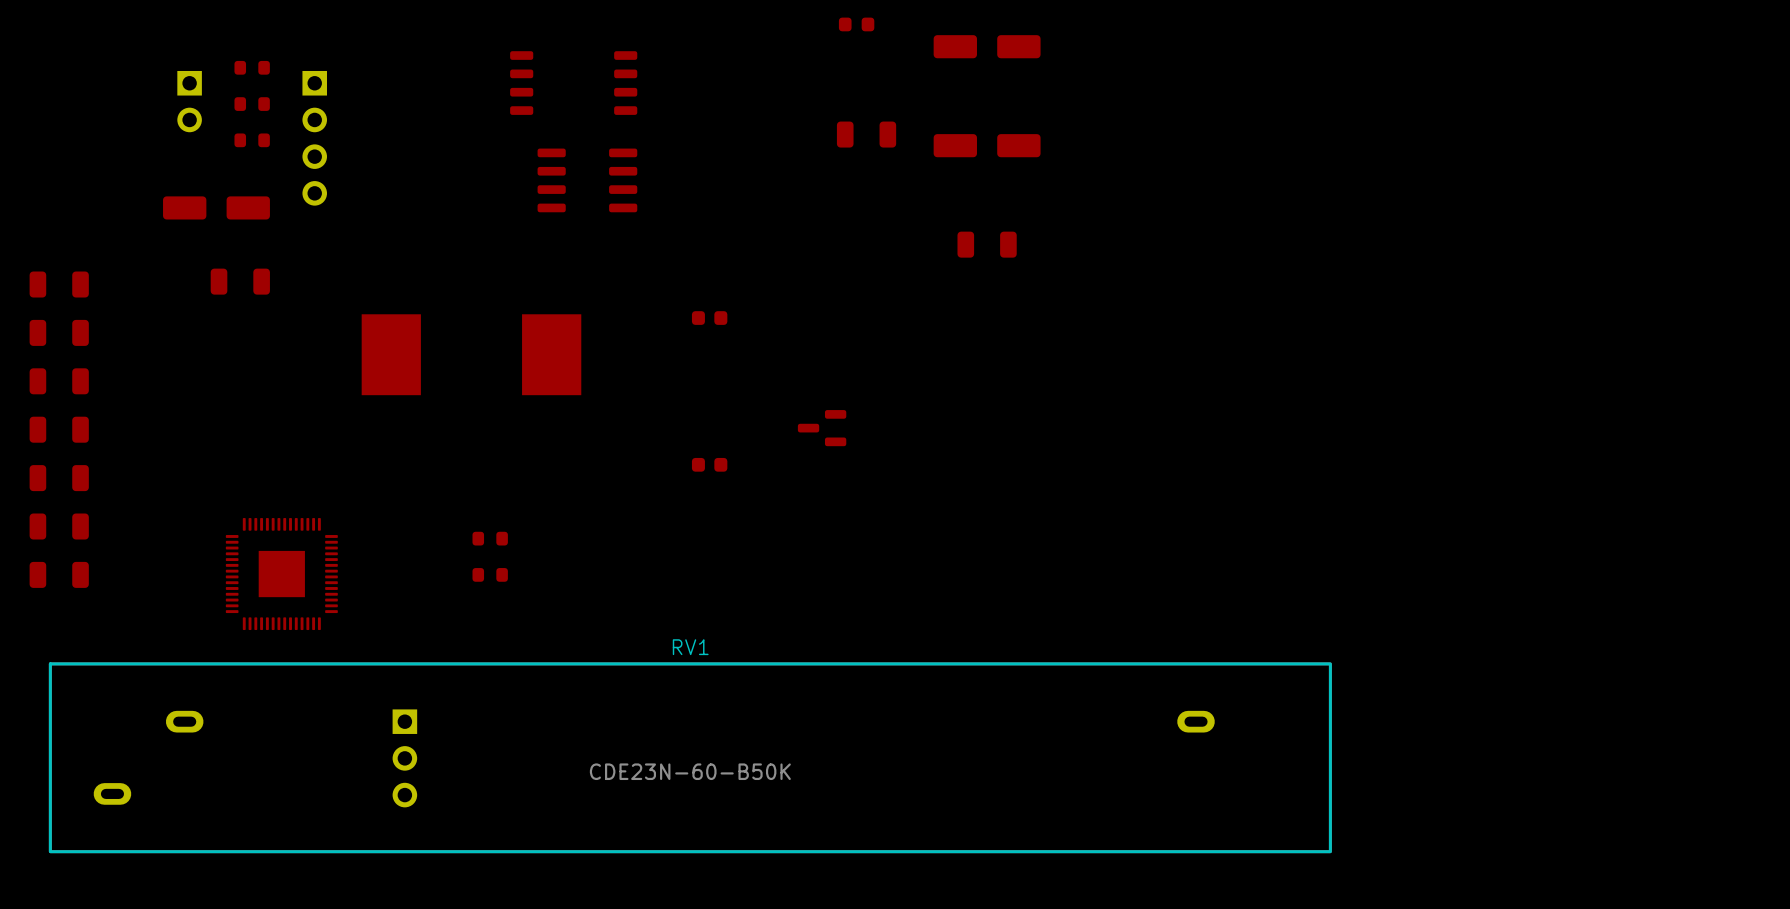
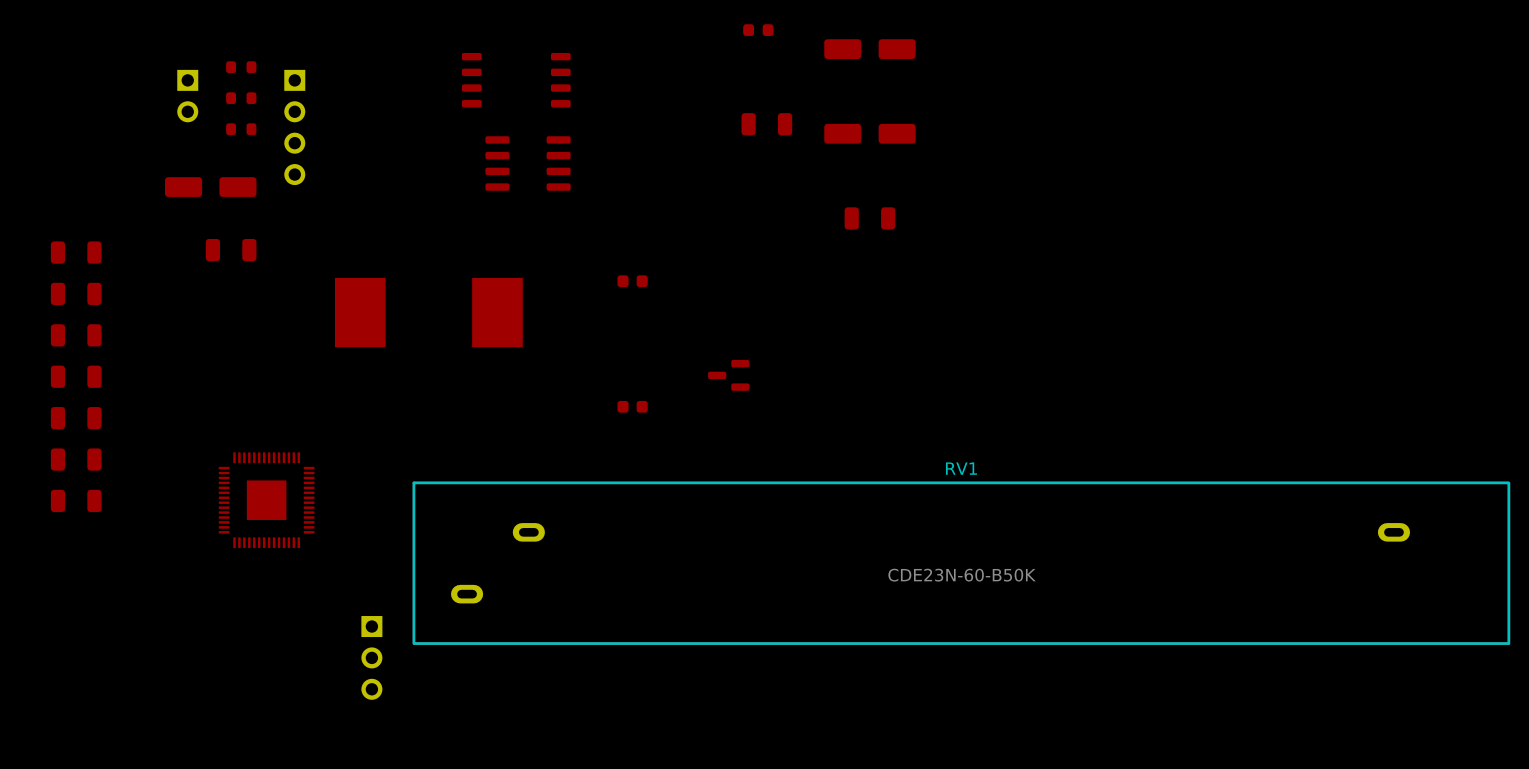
part: (490, 538) -> none
part: (490, 574) -> none
RV1 position: (690, 757) -> (961, 563)

